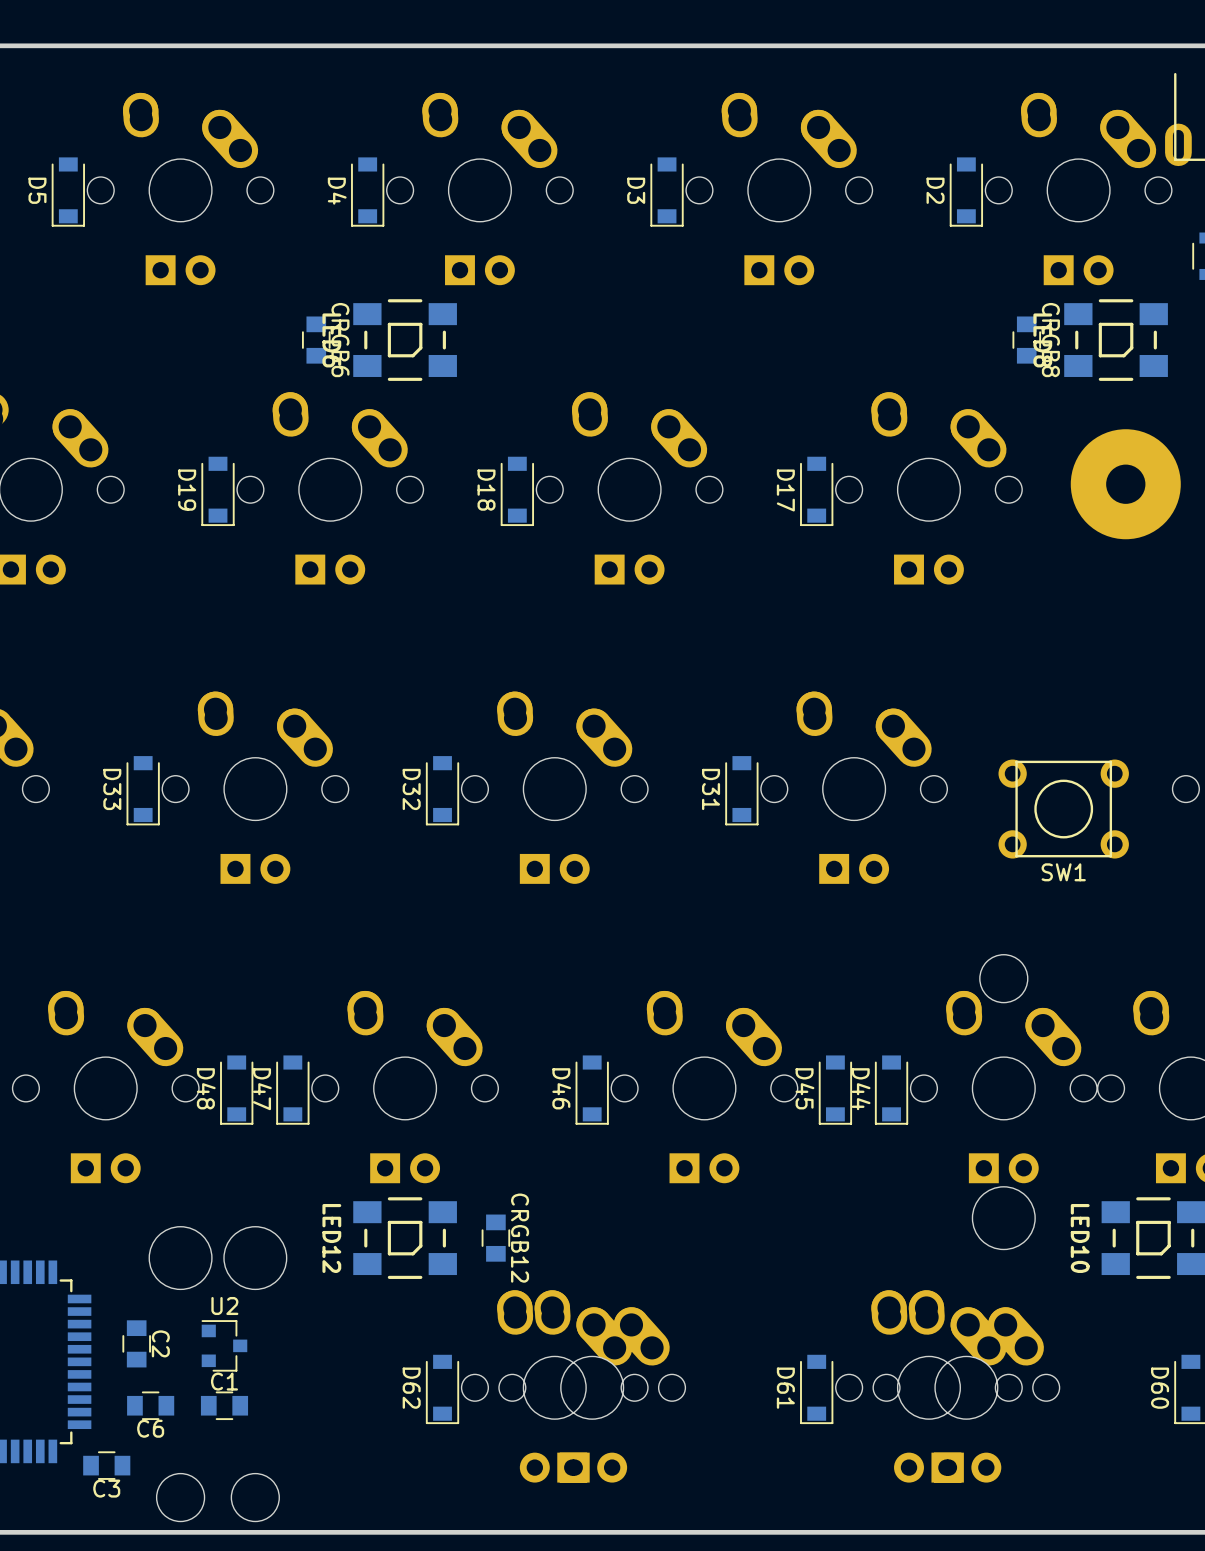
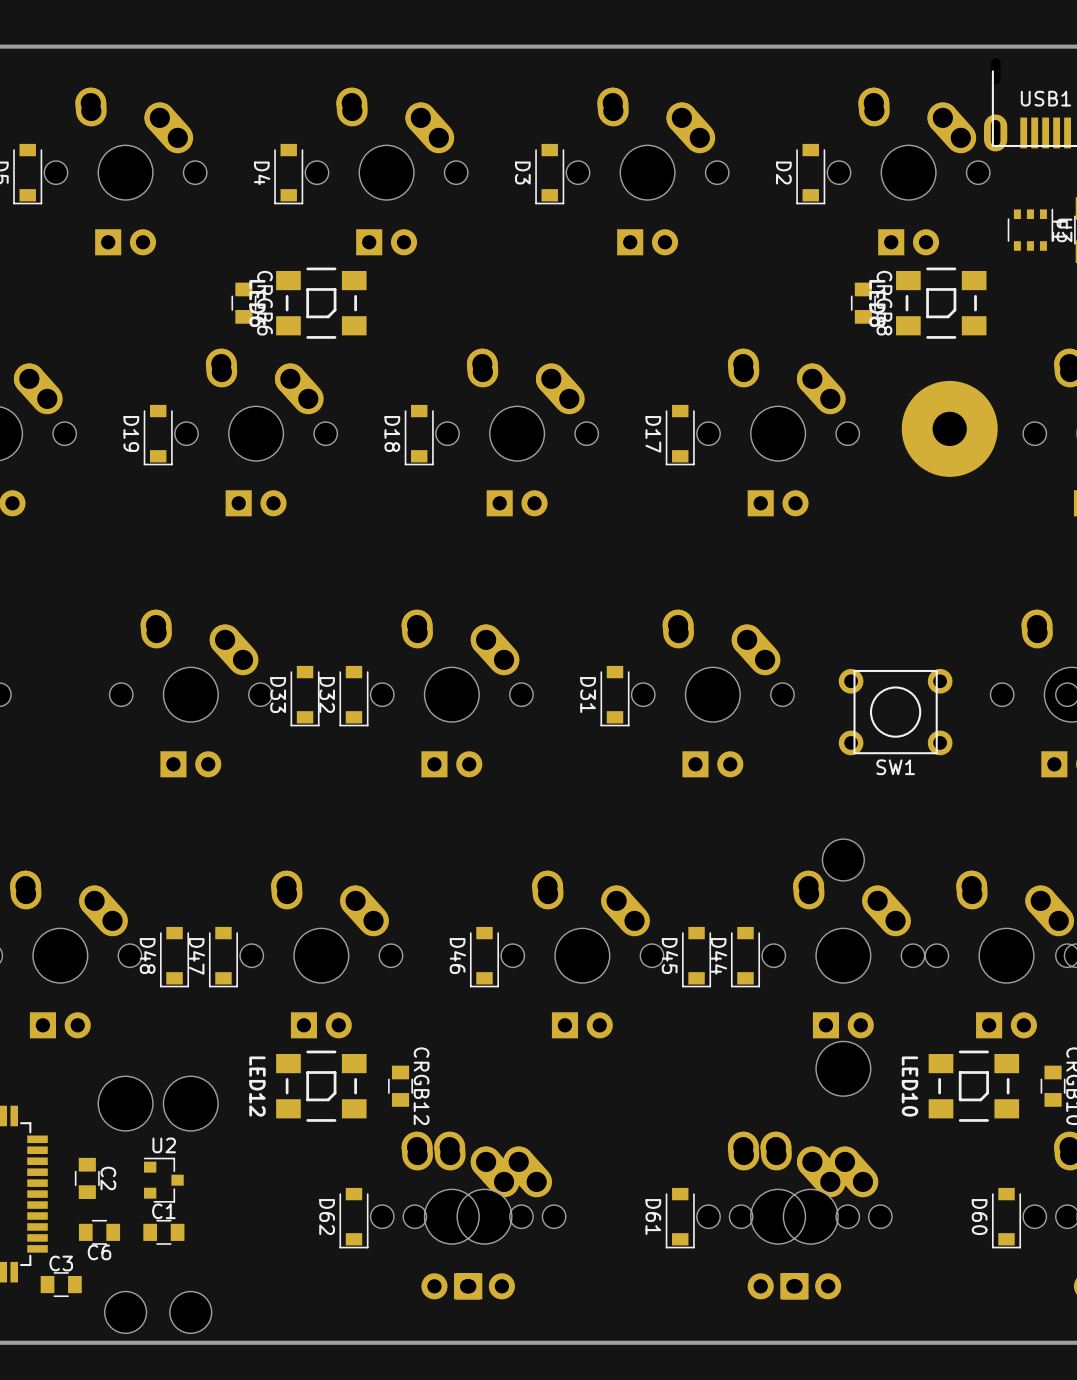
D33 position: (143, 790) -> (305, 696)
C3 name position: C3 (106, 1488) -> C3 (61, 1263)

